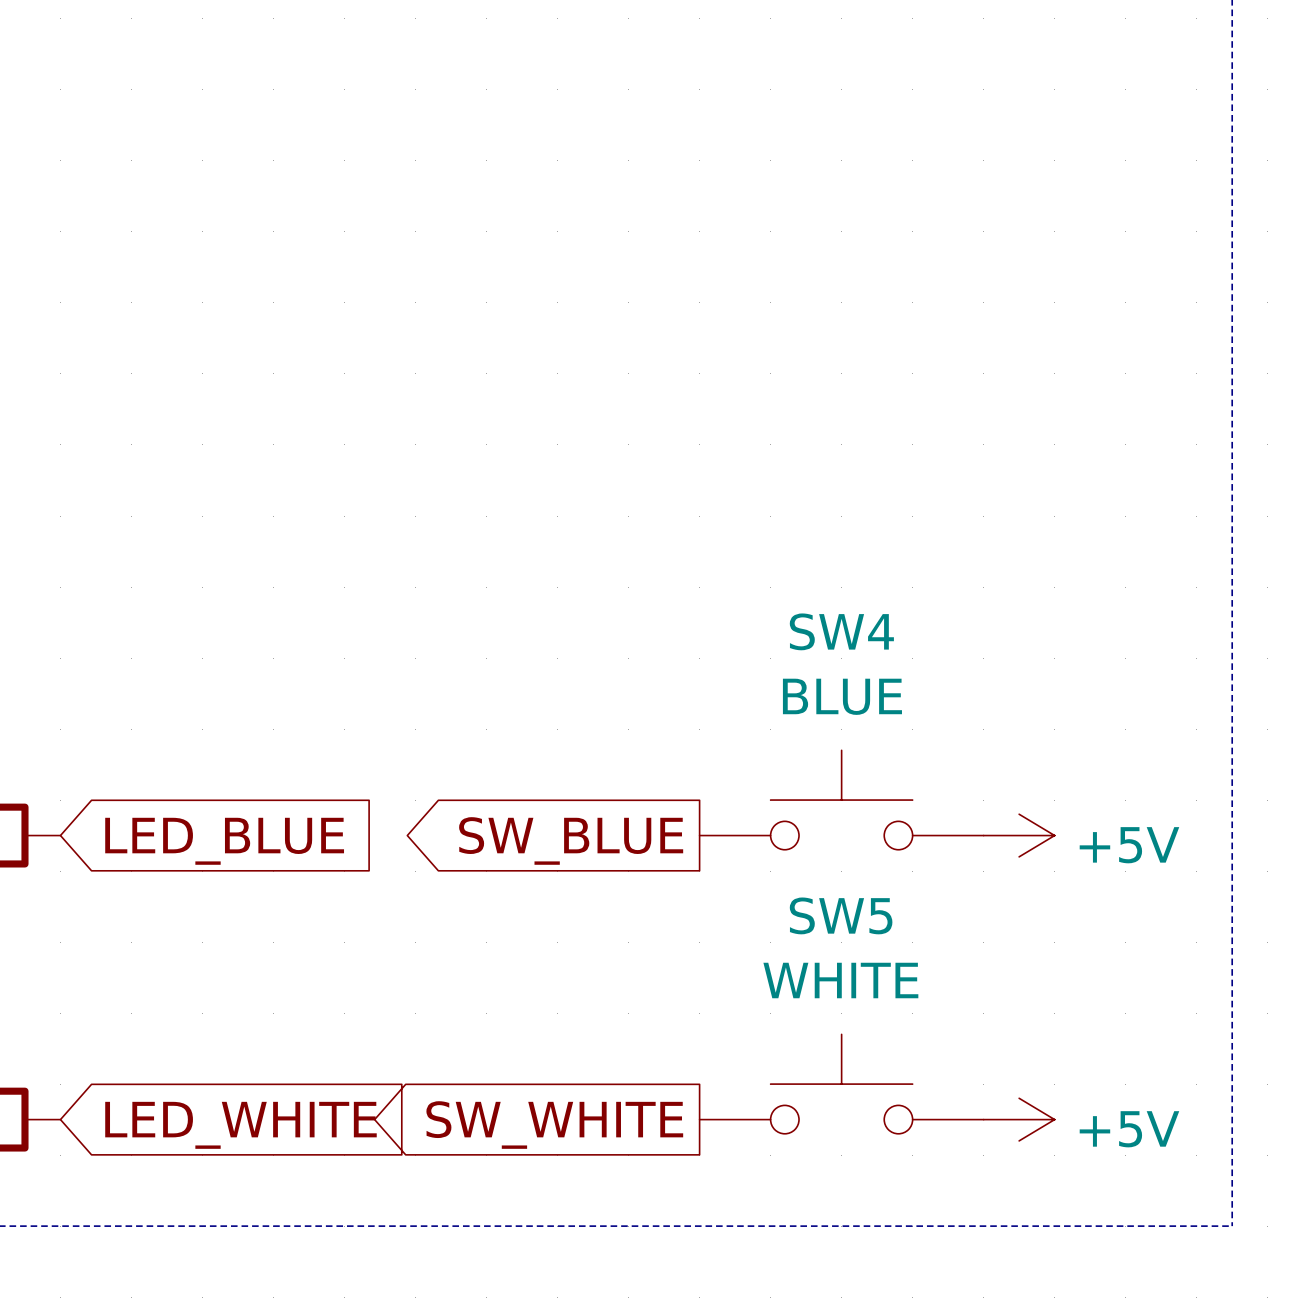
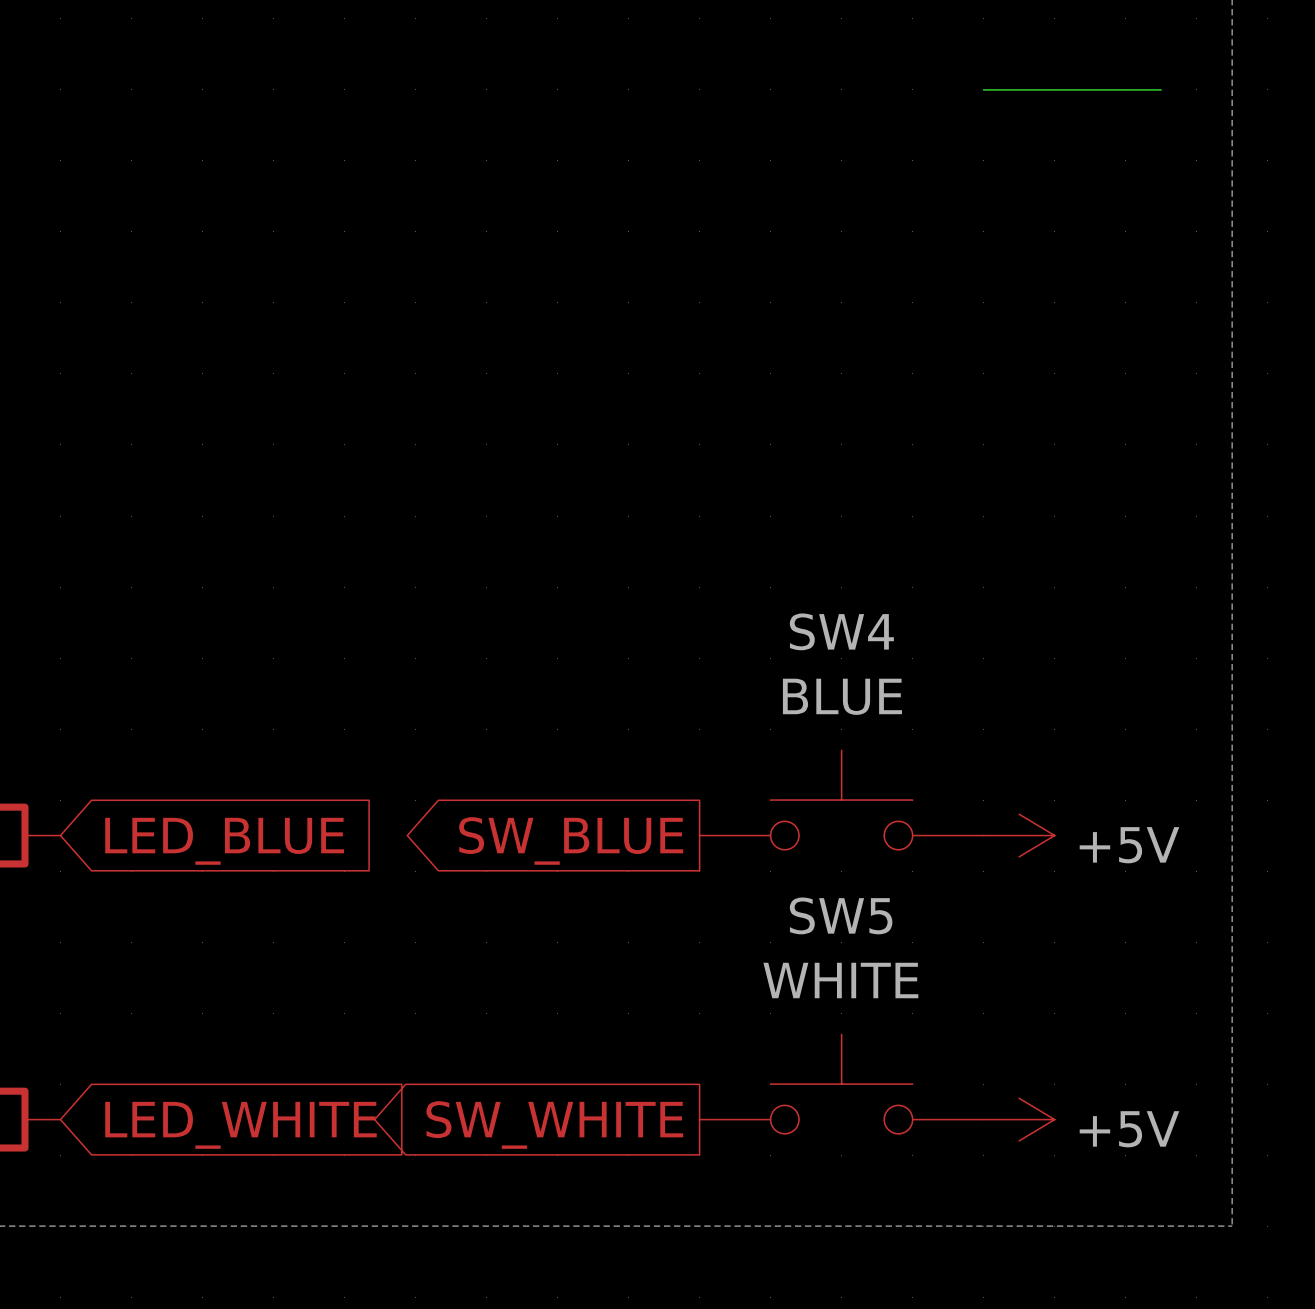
wire: none -> (983, 89) (1161, 89)

